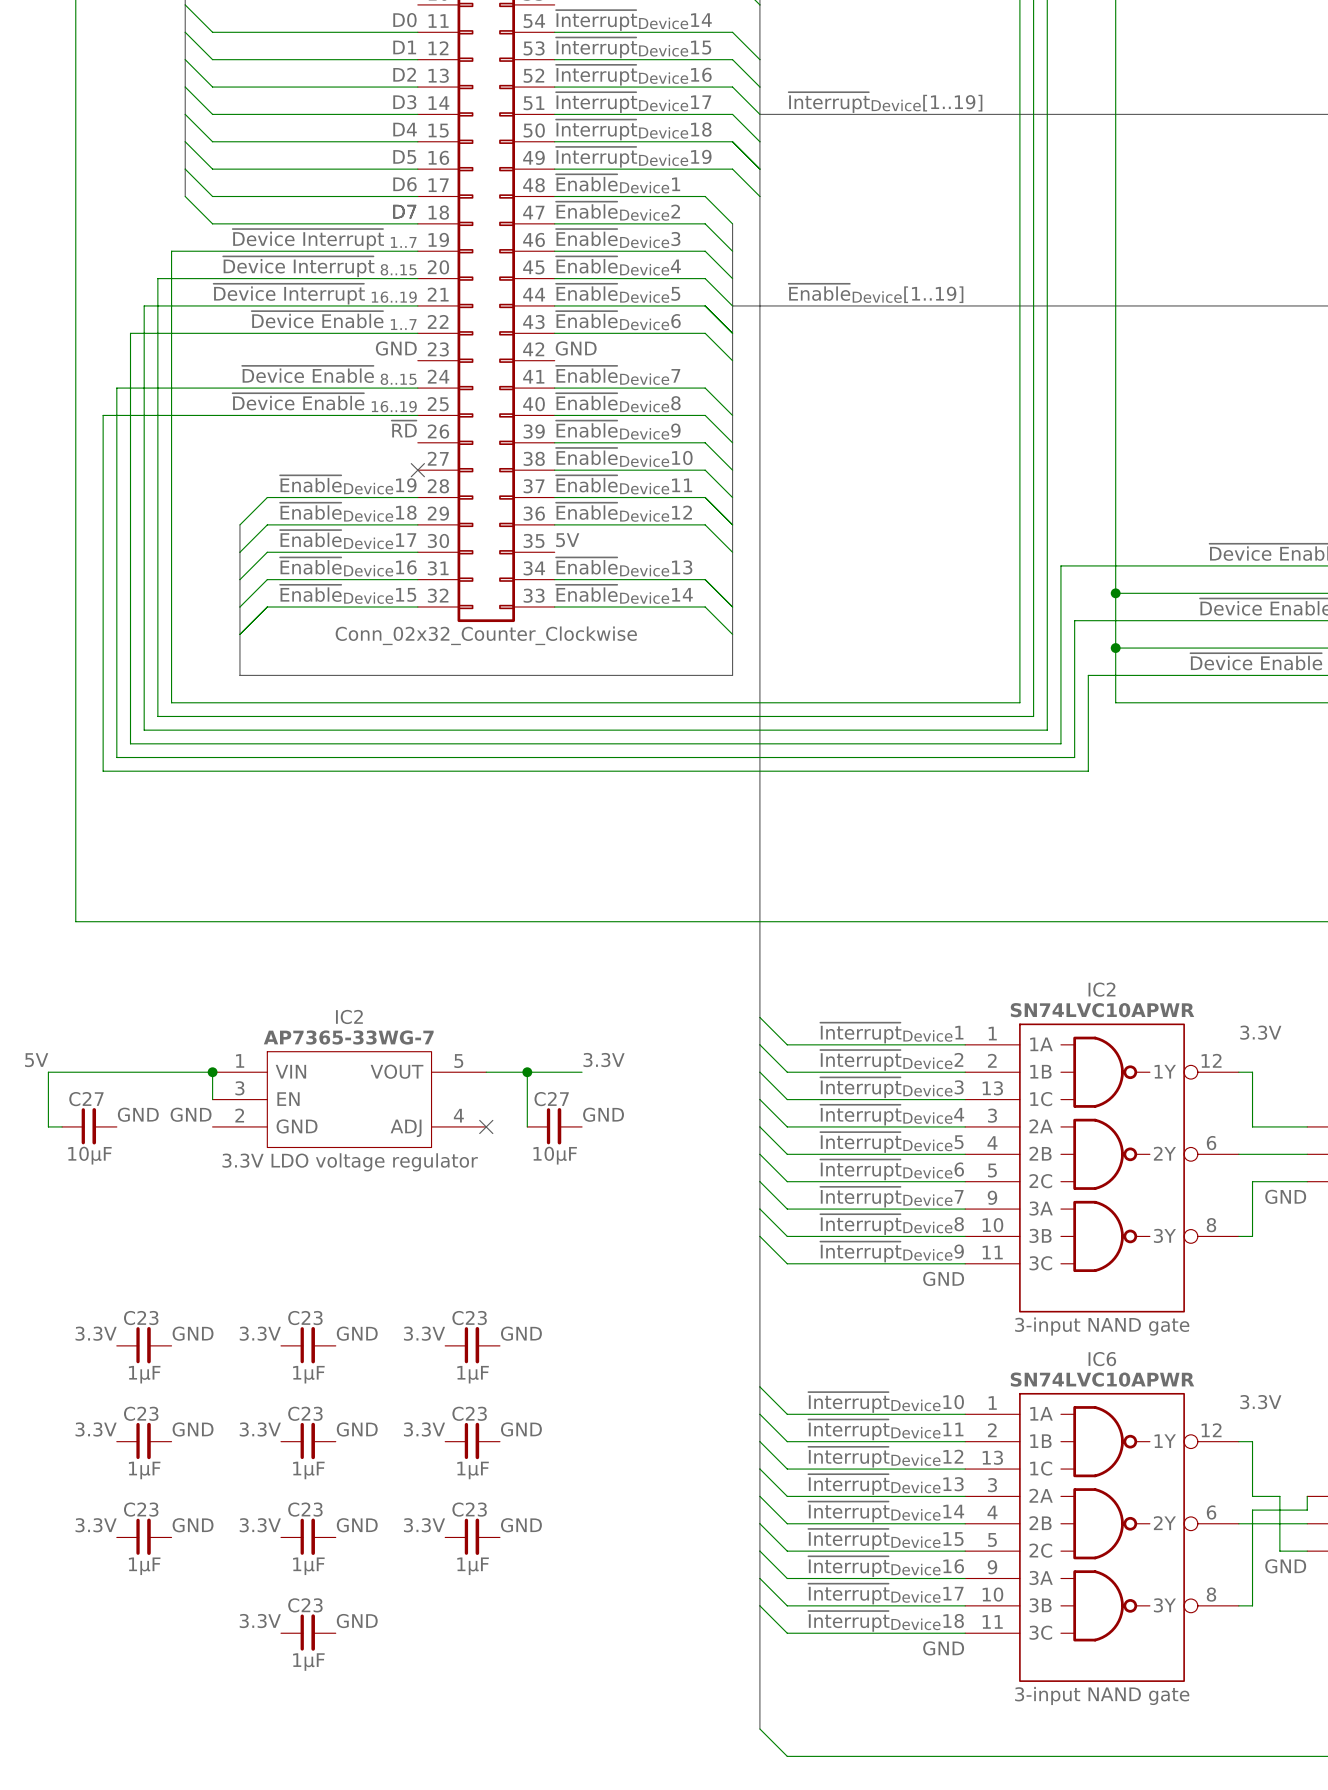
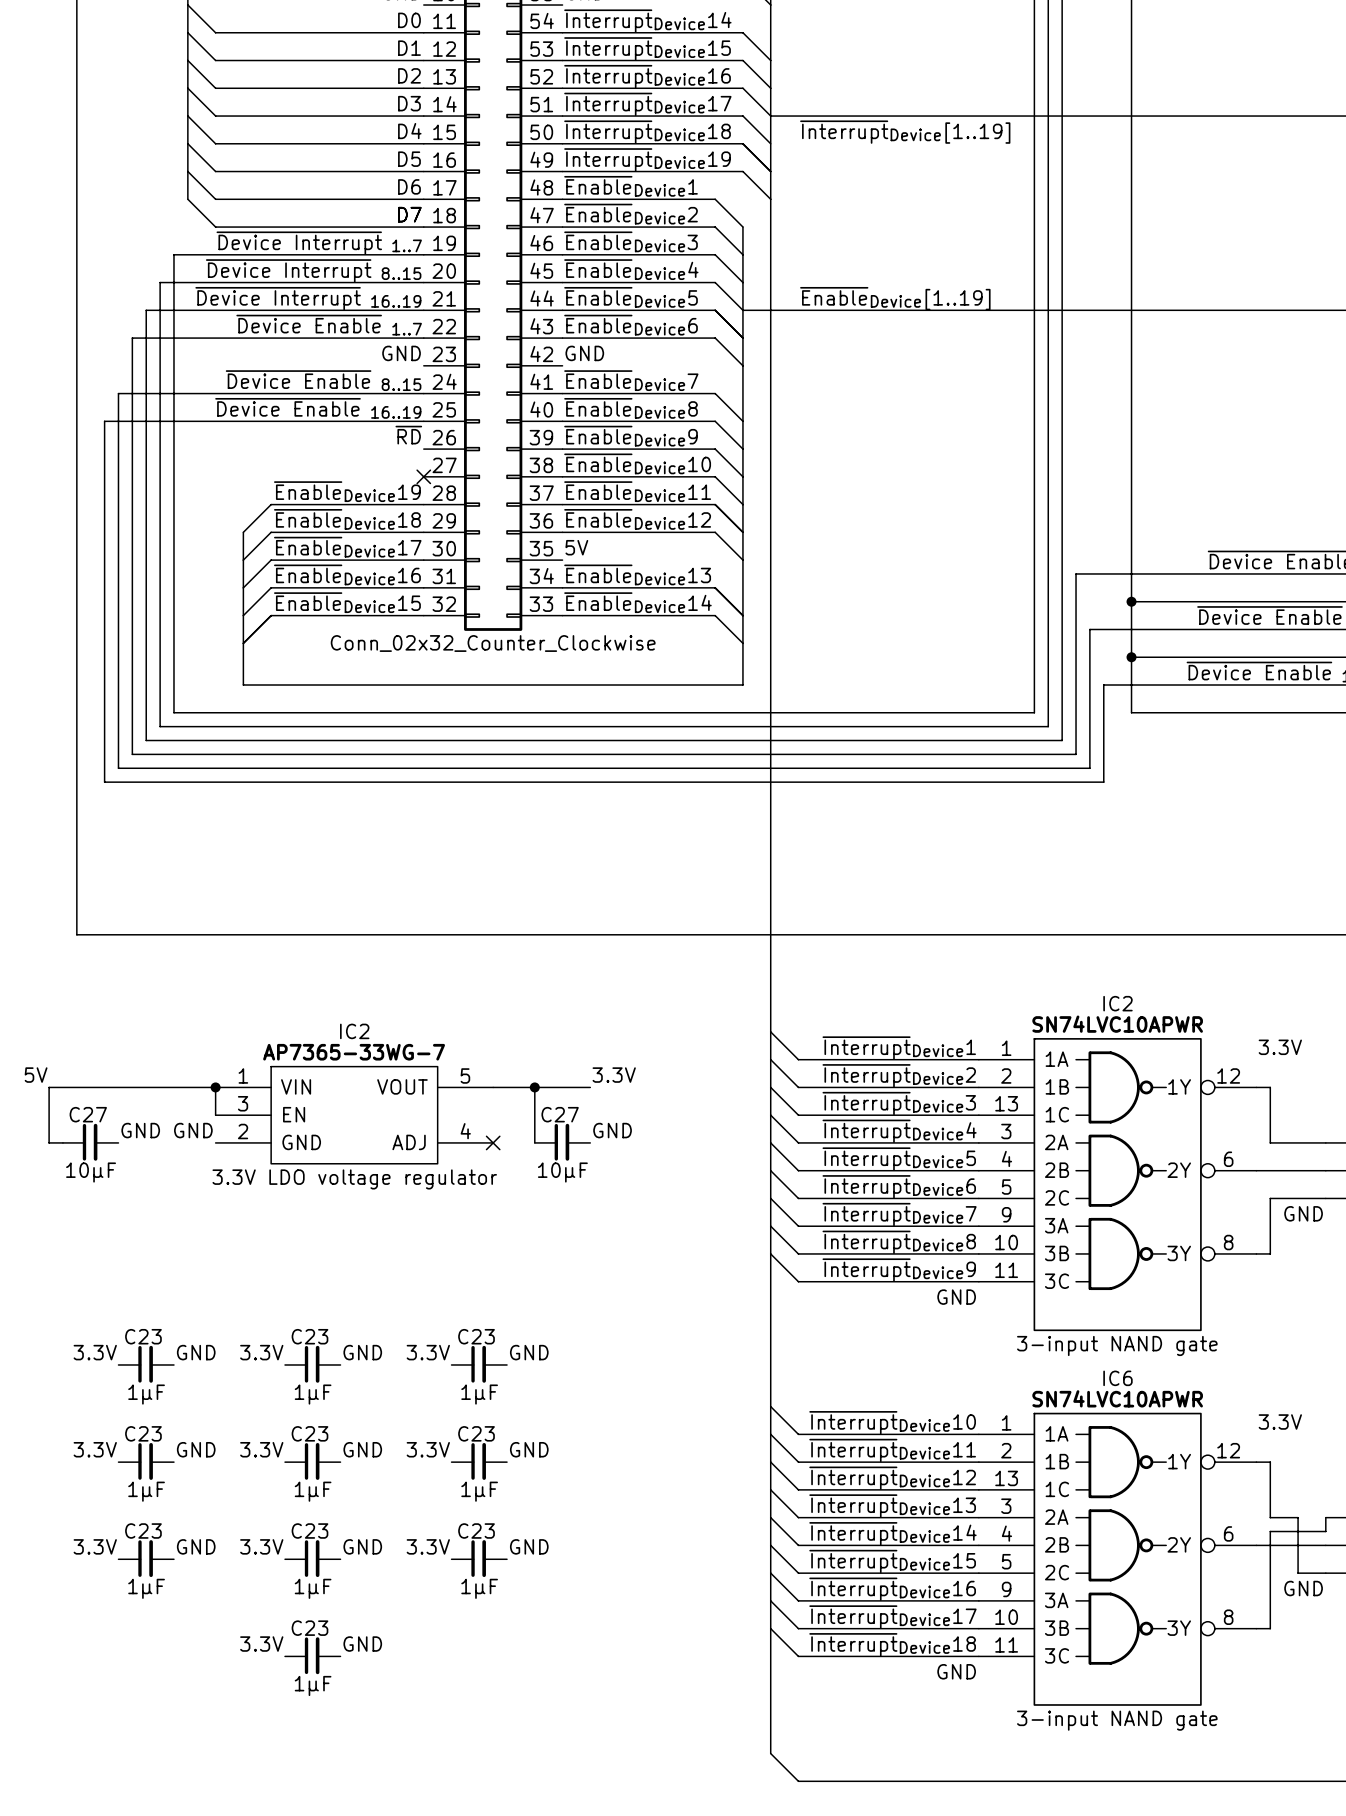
label position: ~{Interrupt}Device[1..19] (885, 102) -> ~{Interrupt}Device[1..19] (905, 132)

